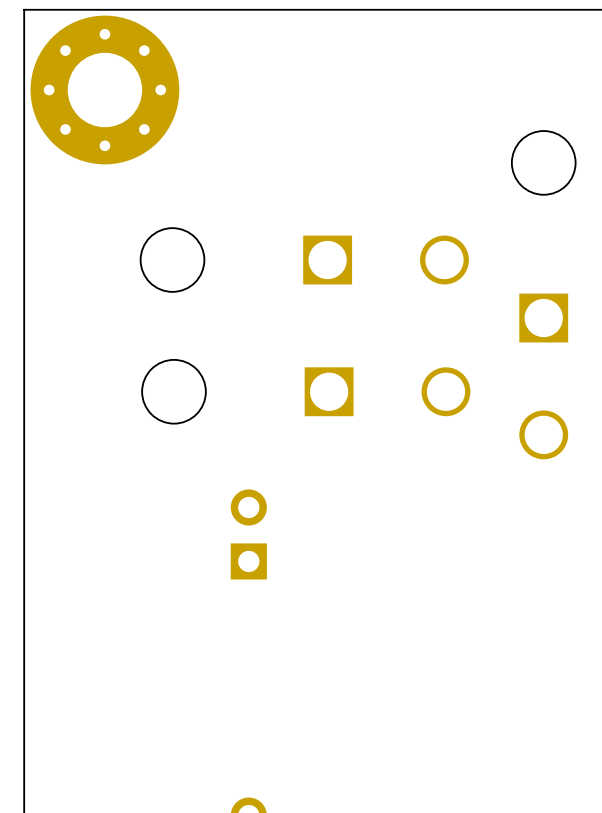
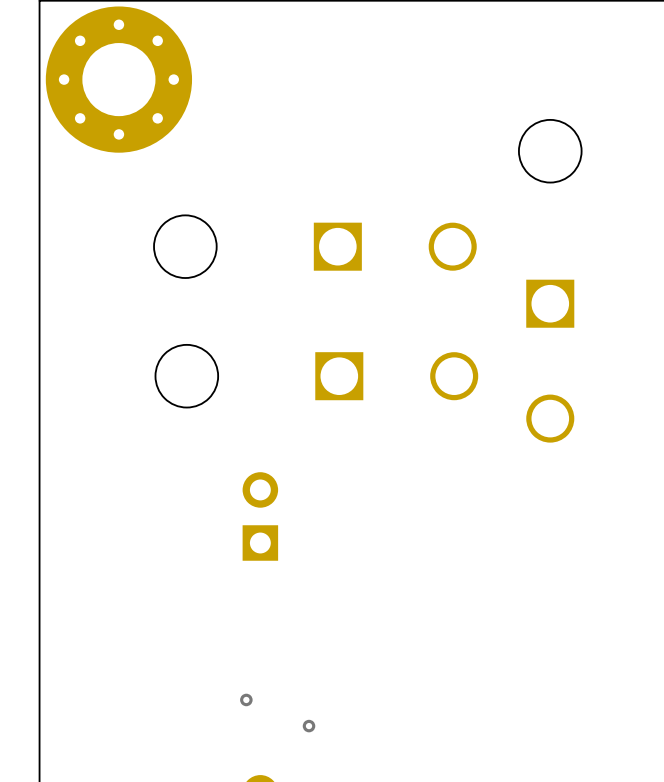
via: none -> (246, 699)
via: none -> (309, 726)

